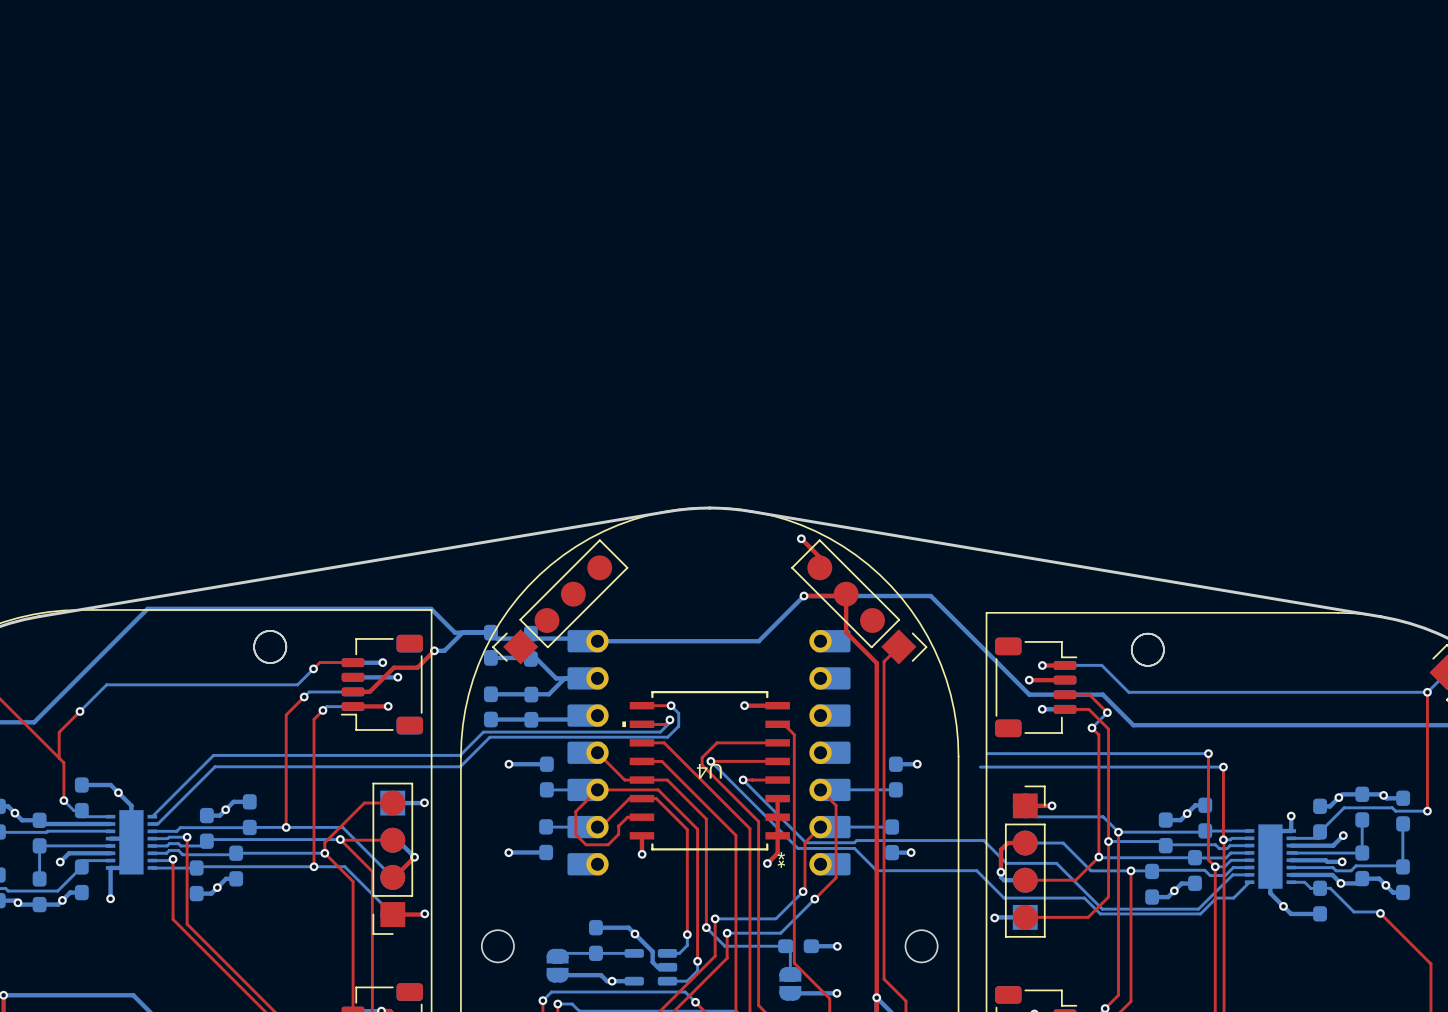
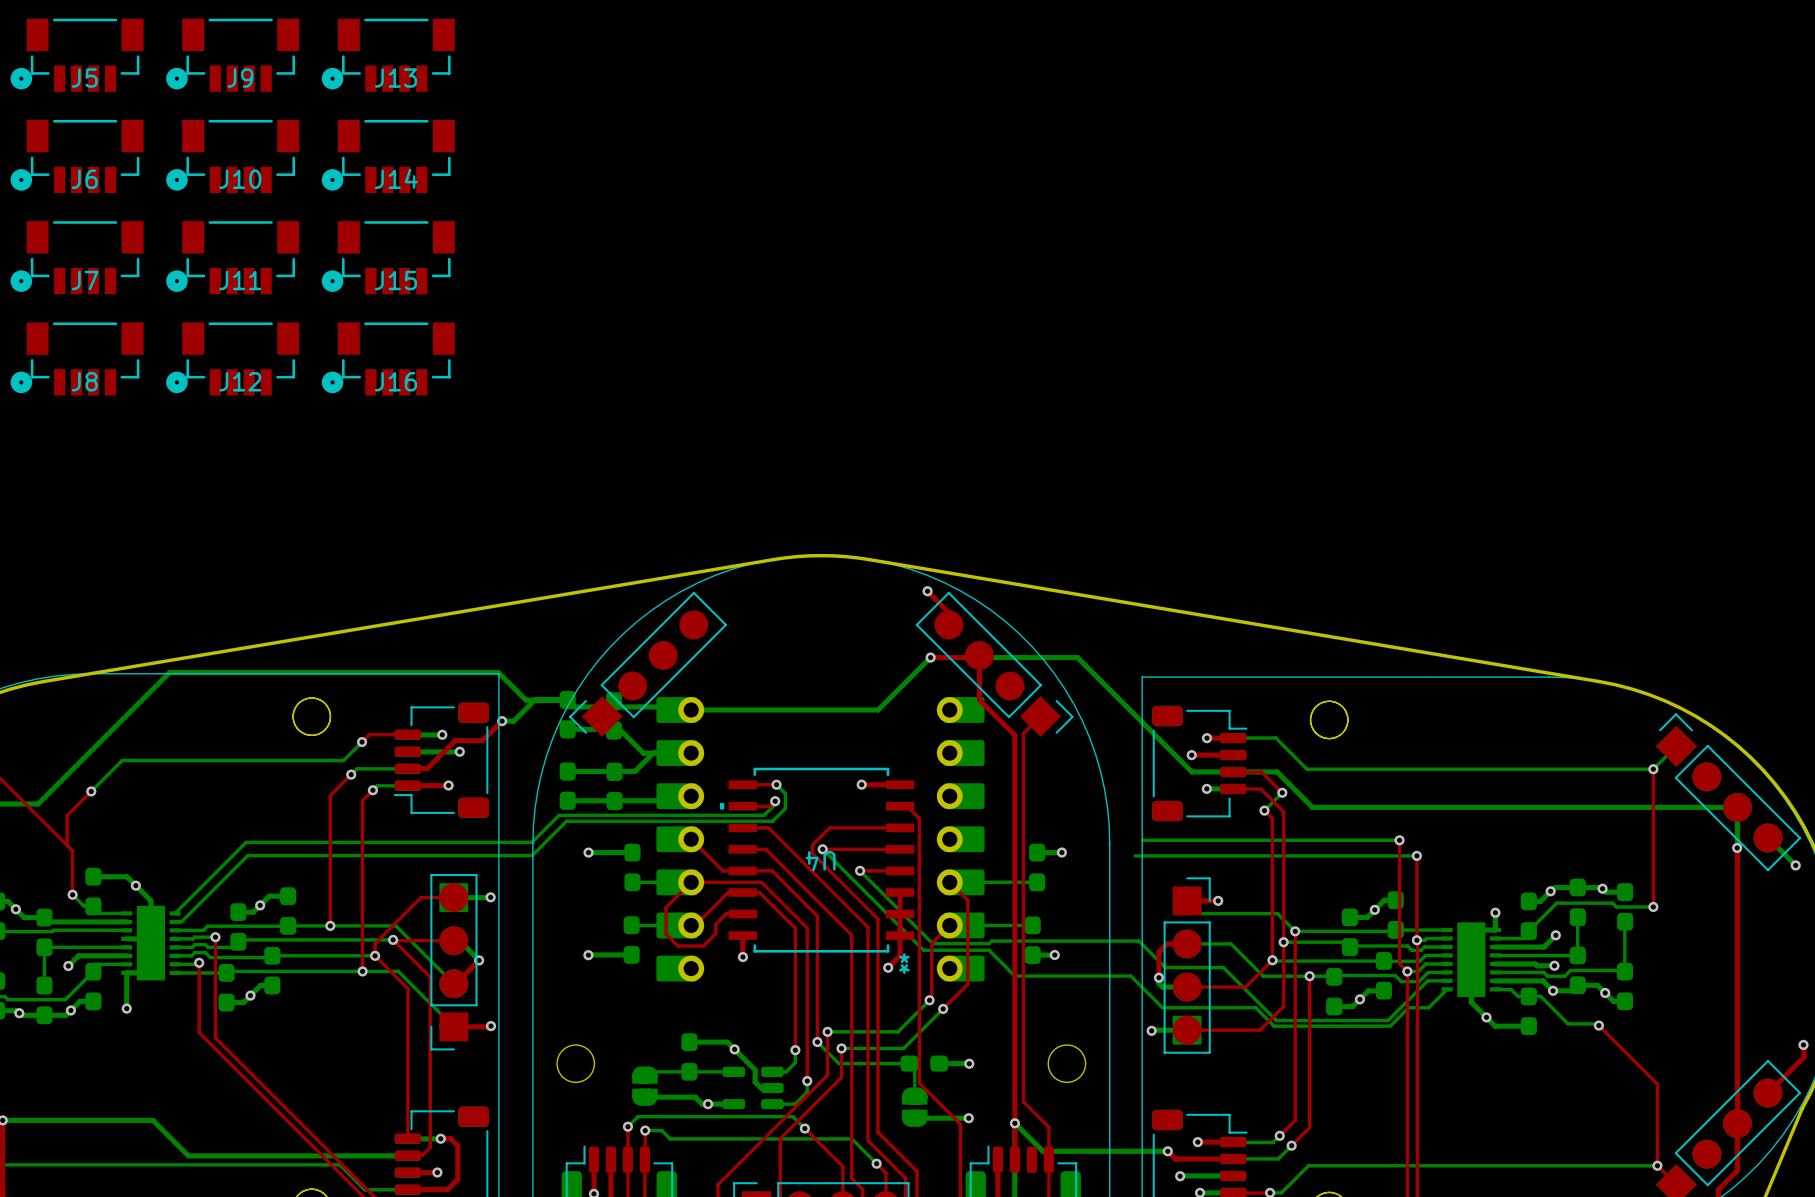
J5: none -> (77, 55)
J9: none -> (232, 55)
J13: none -> (388, 55)
J6: none -> (77, 156)
J10: none -> (232, 156)
J14: none -> (388, 156)
J7: none -> (77, 257)
J11: none -> (232, 257)
J15: none -> (388, 257)
J8: none -> (77, 358)
J12: none -> (232, 358)
J16: none -> (388, 358)

